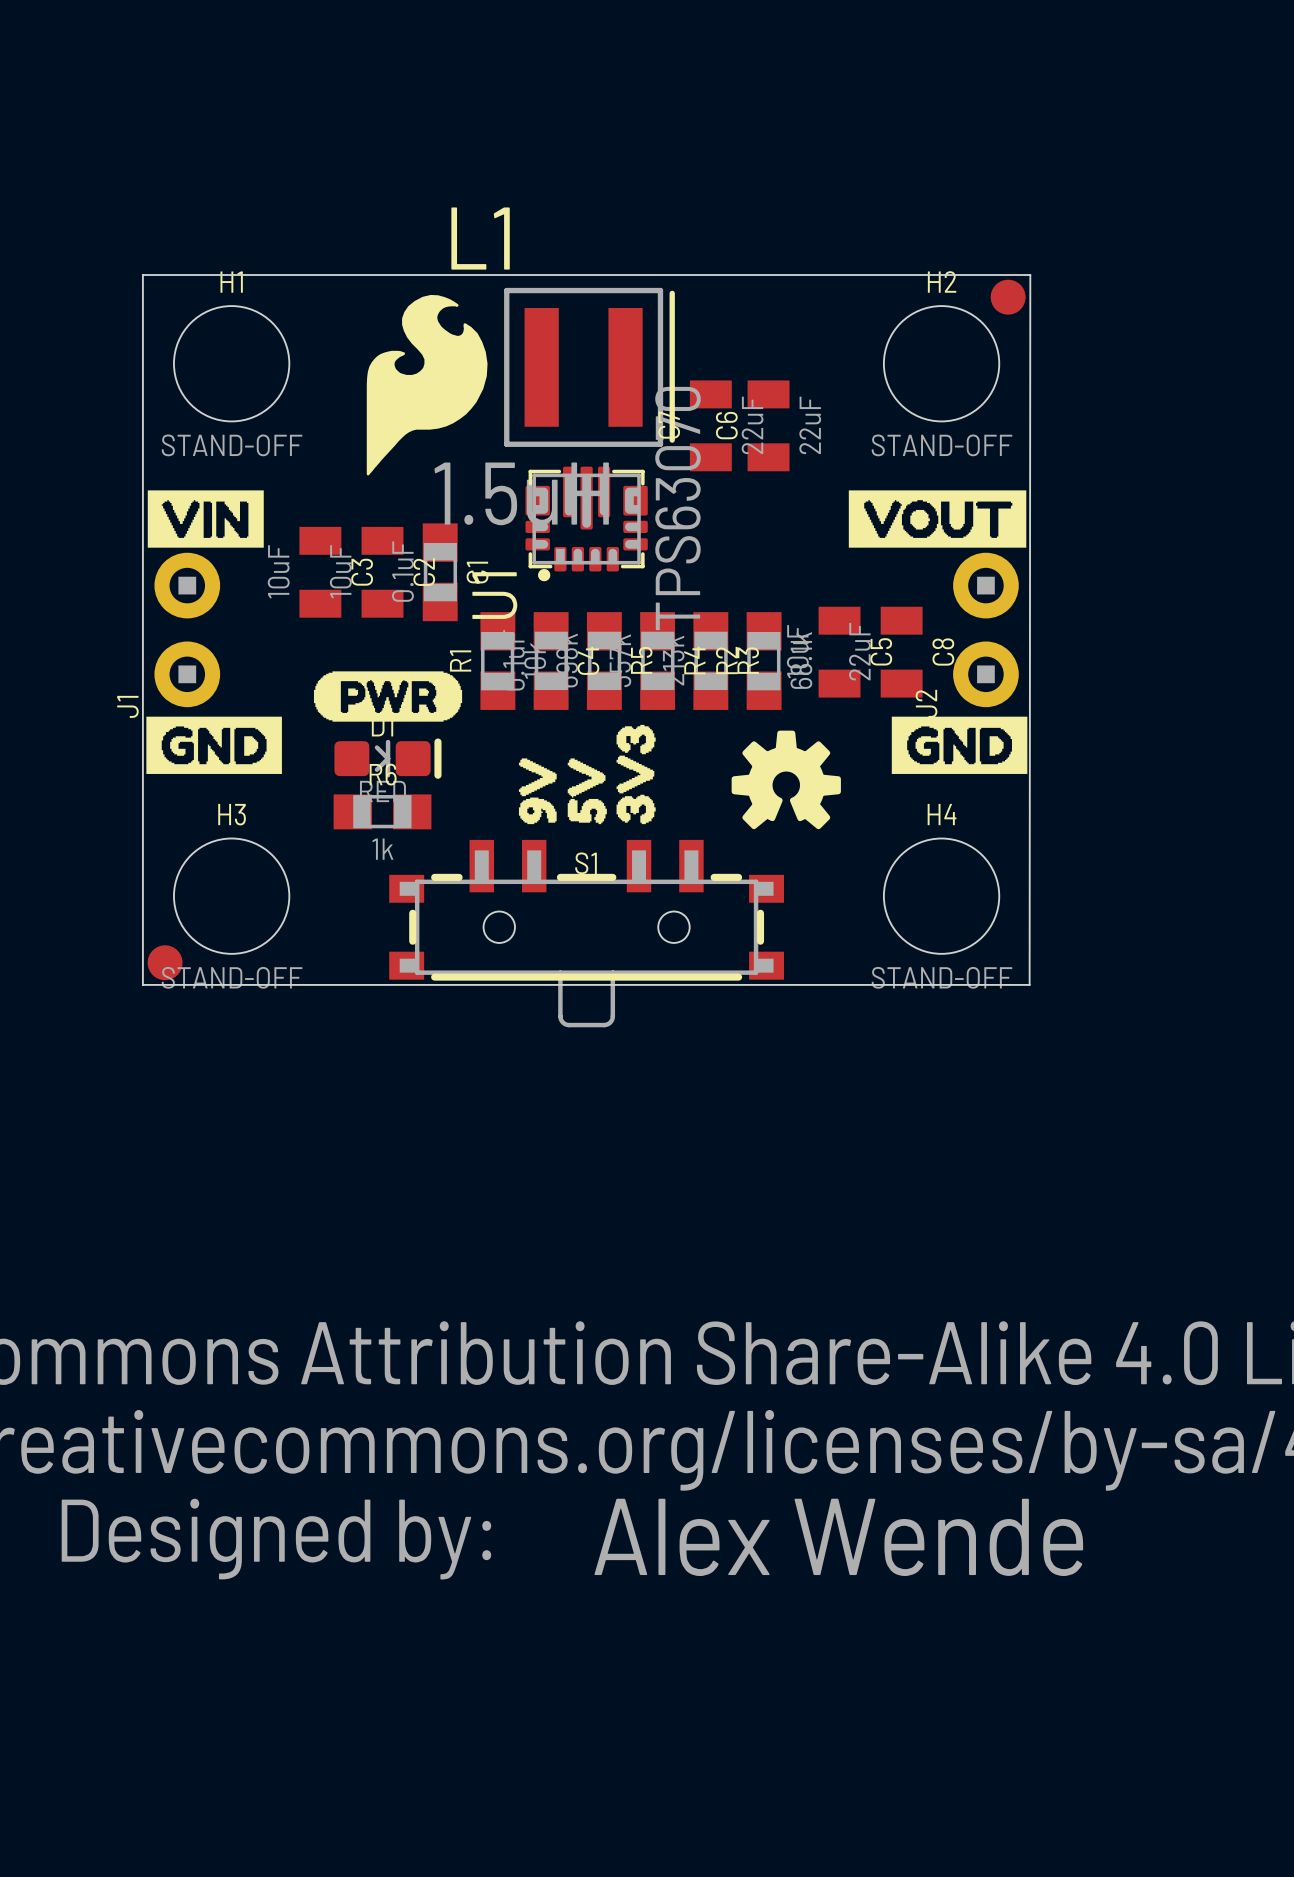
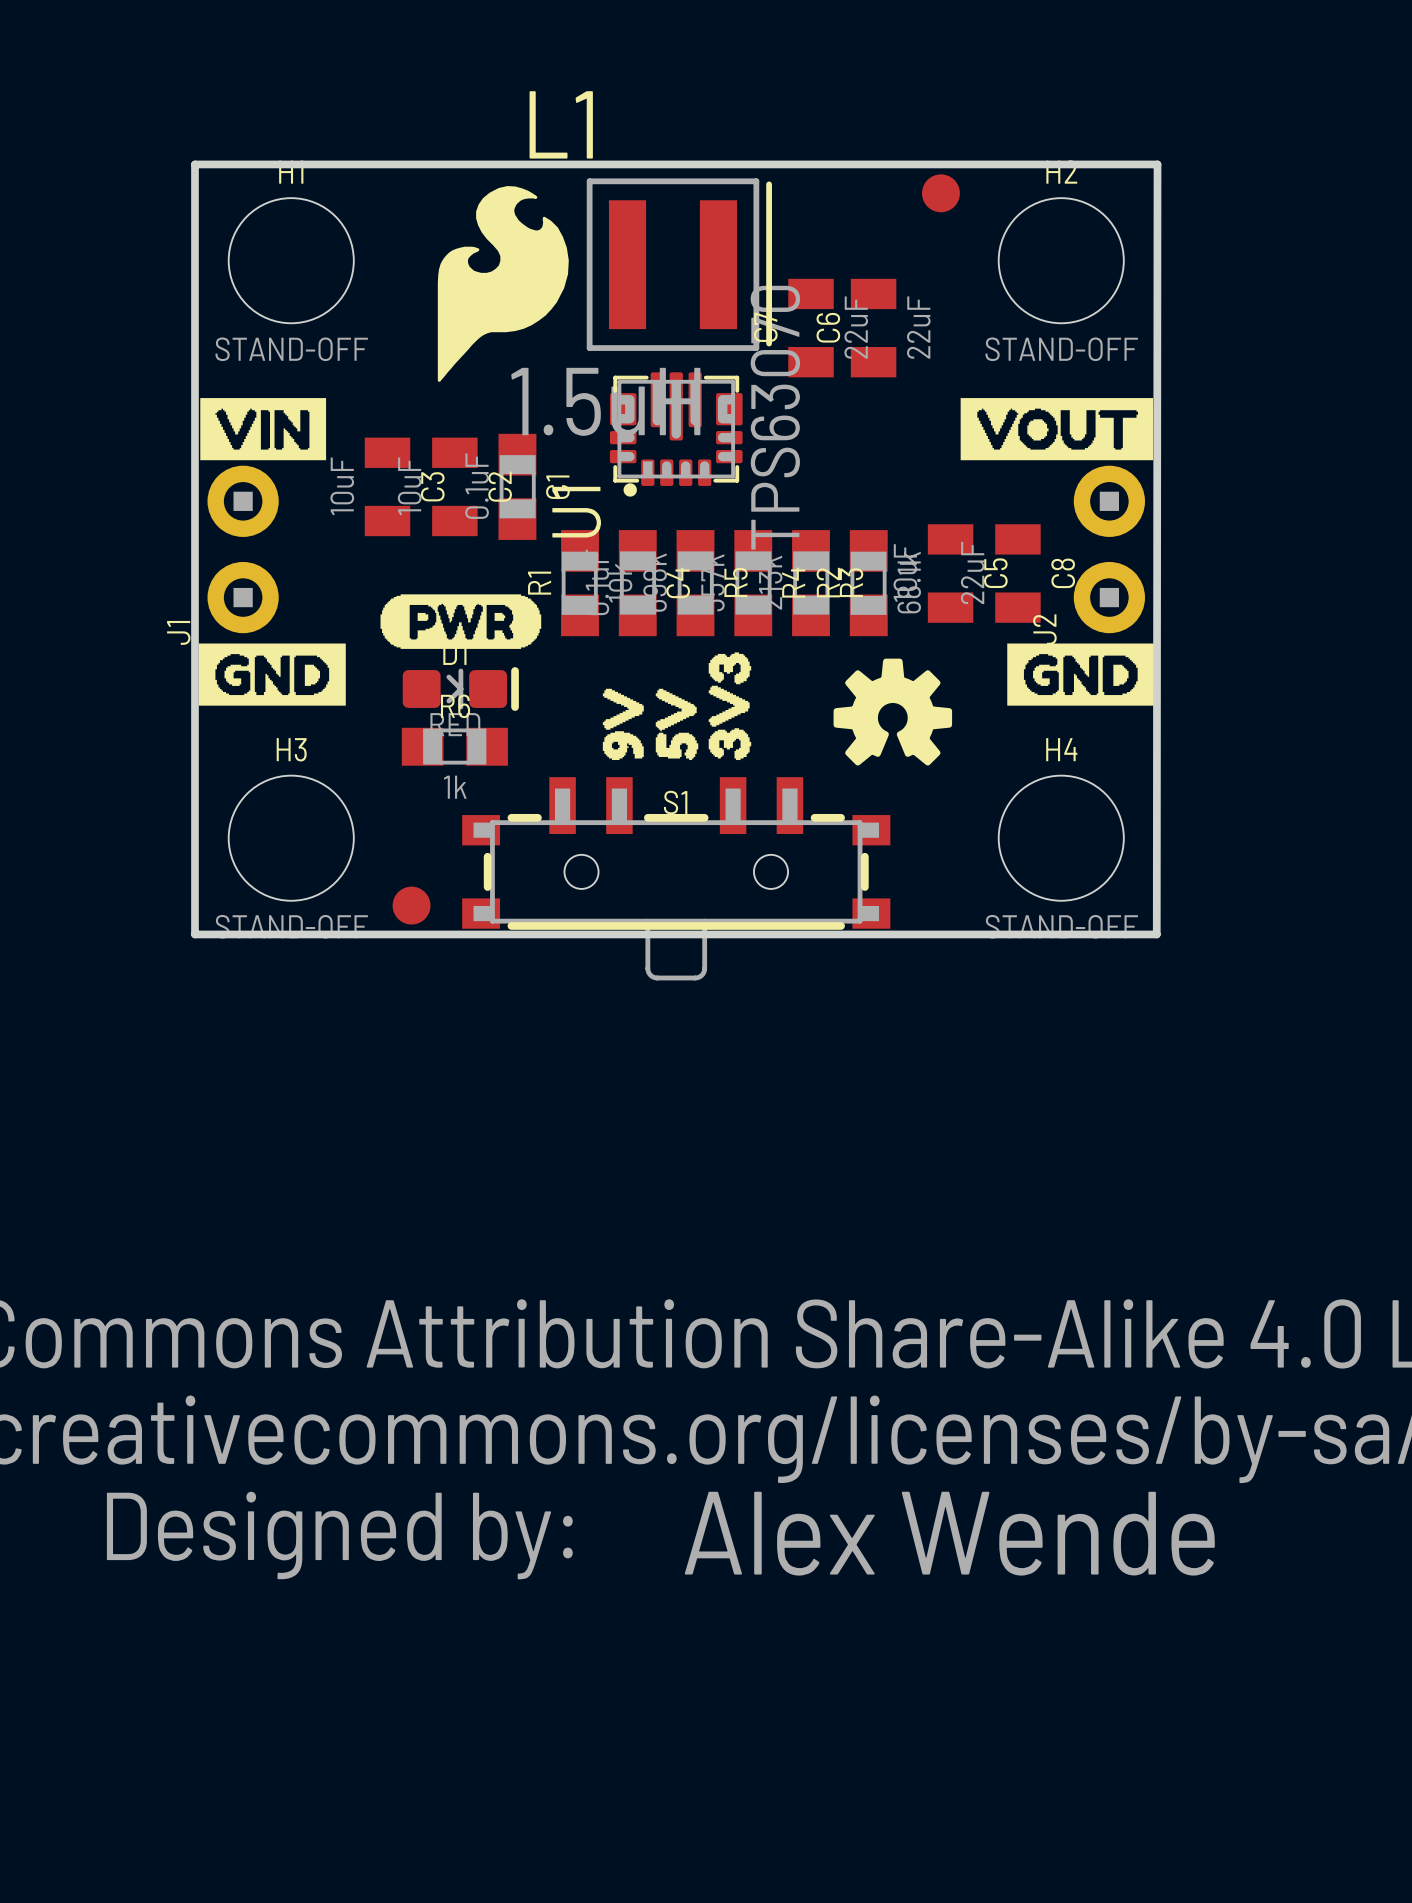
board edge width: thin (142, 275) (1030, 275) (1029, 984) (142, 984) (142, 275) -> thick (195, 164) (1157, 164) (1156, 934) (195, 934) (195, 164)
part position: (1008, 297) -> (940, 193)
part position: (165, 962) -> (411, 905)

